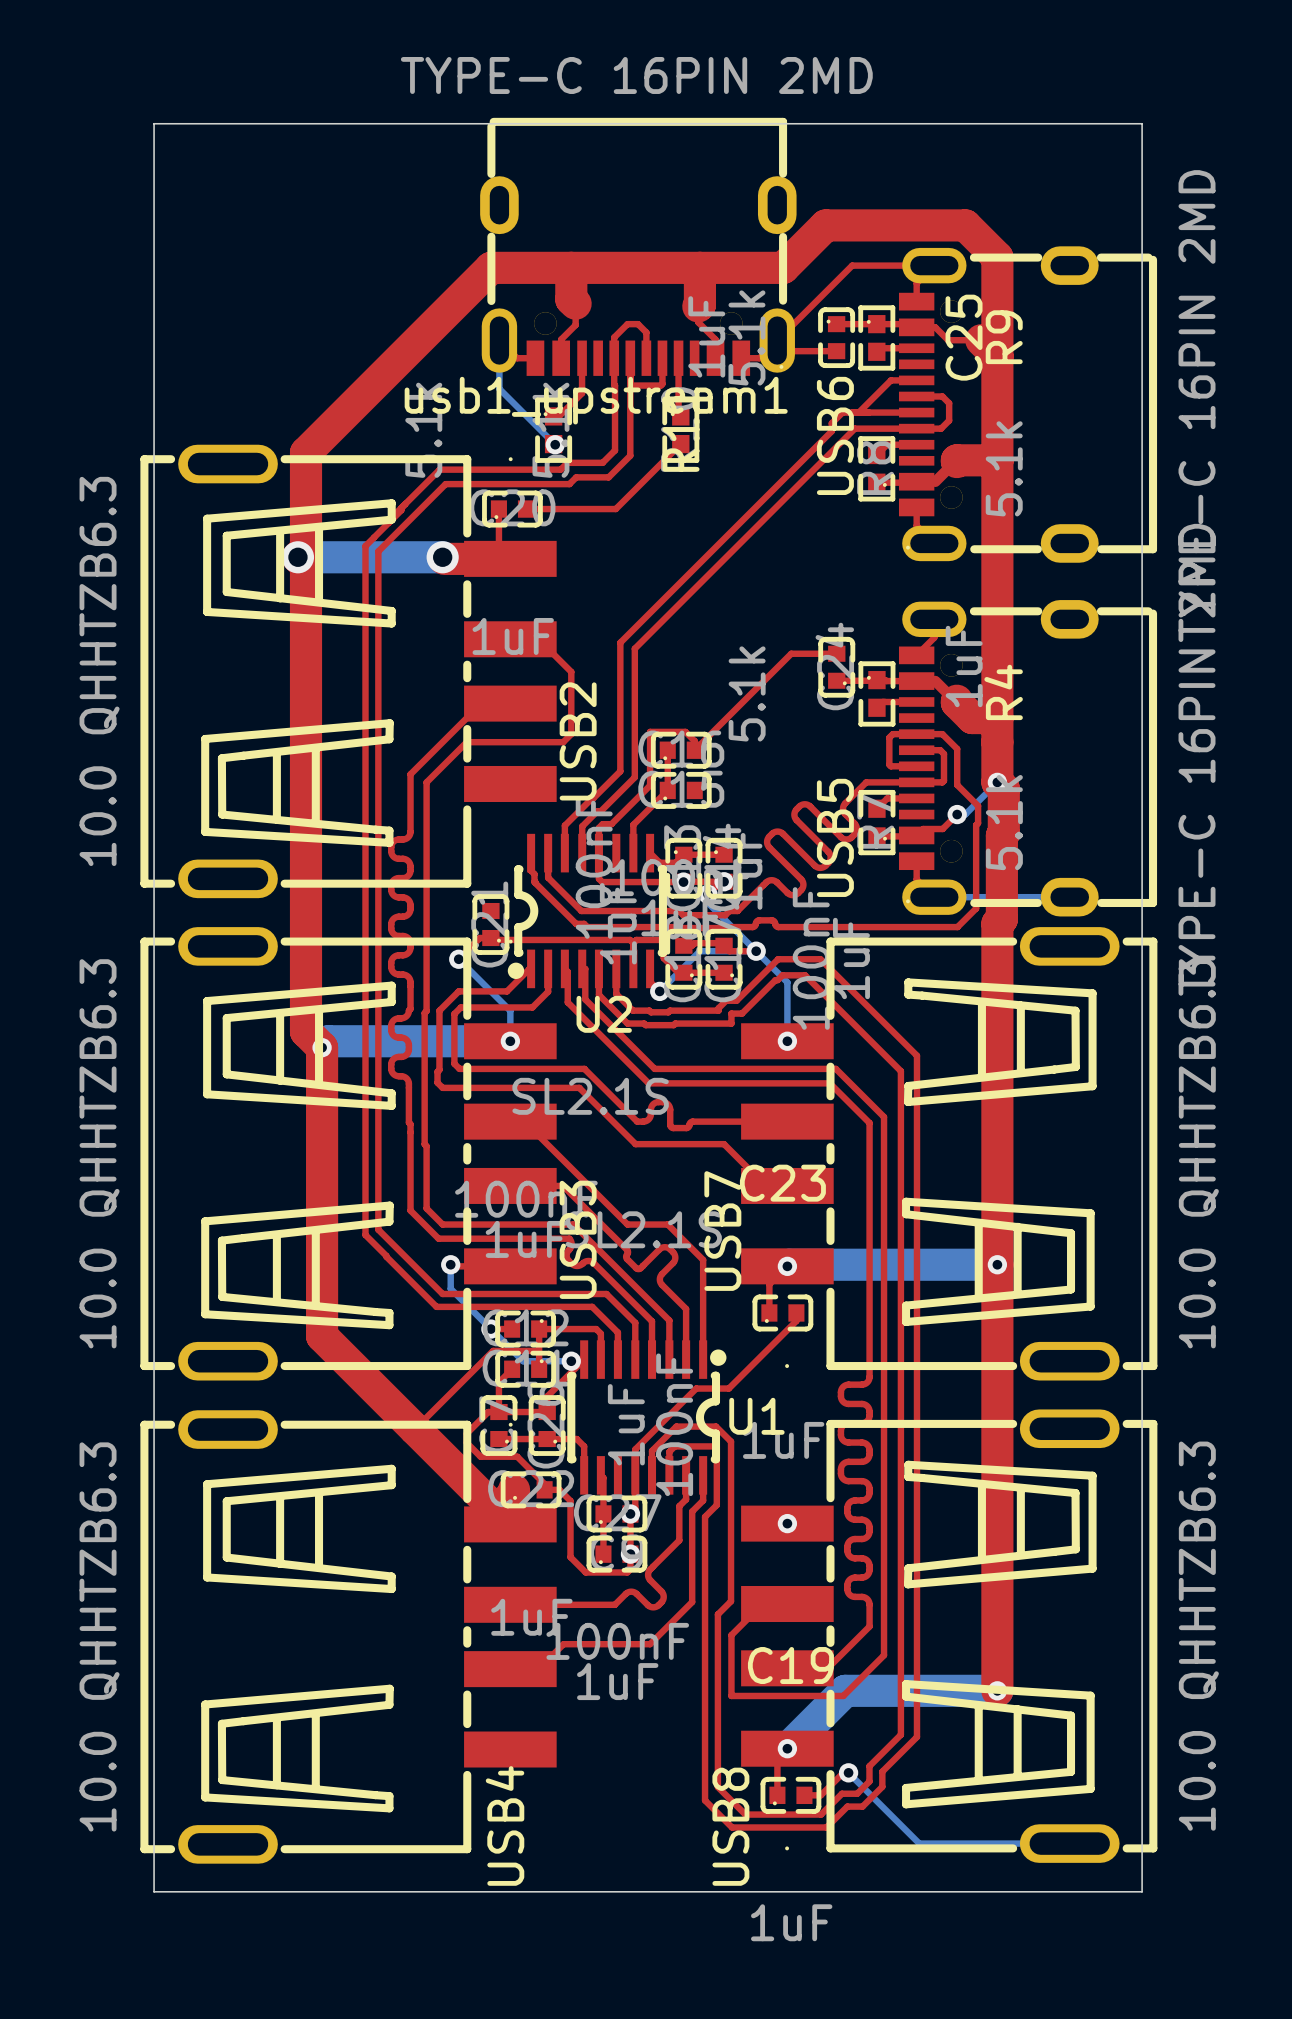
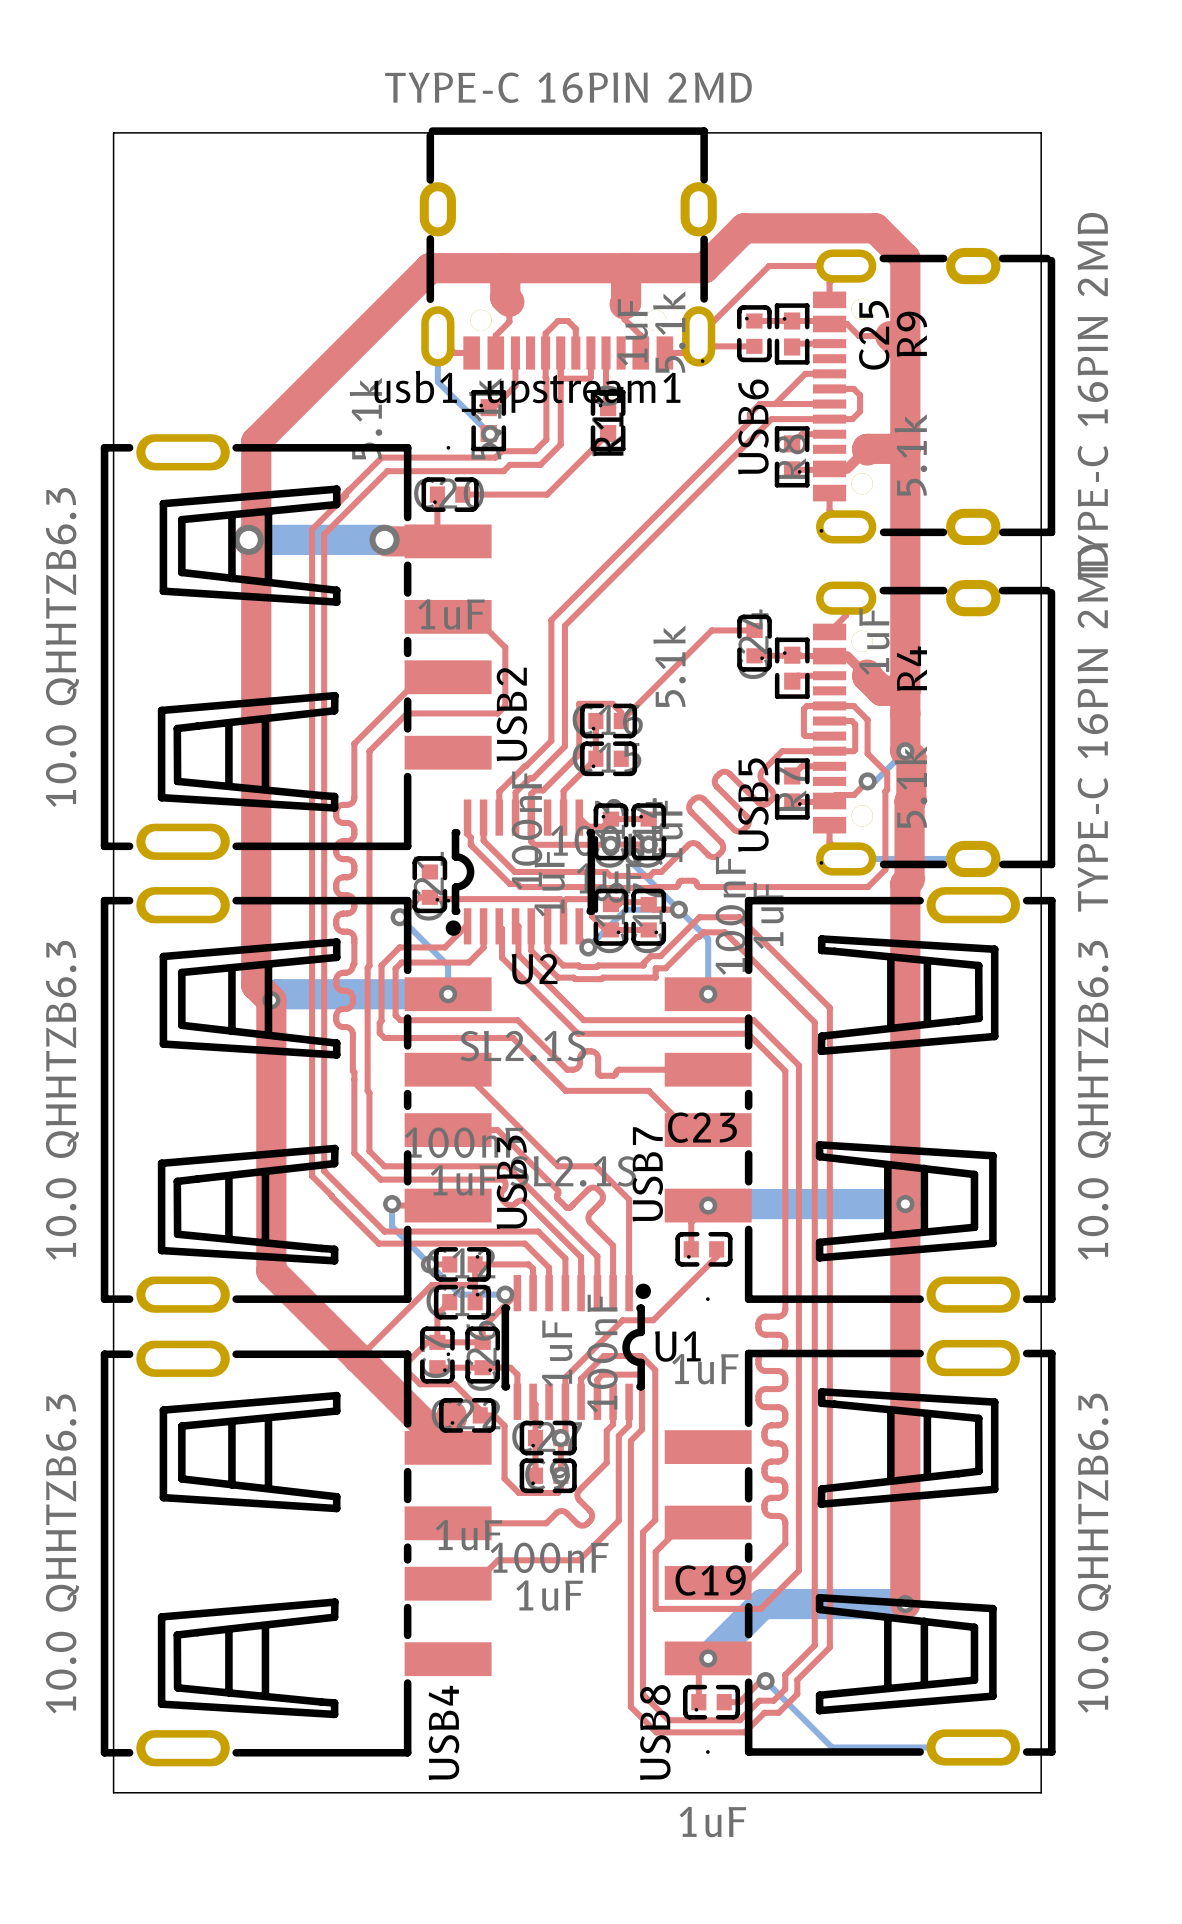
via: (787, 1523) -> none

